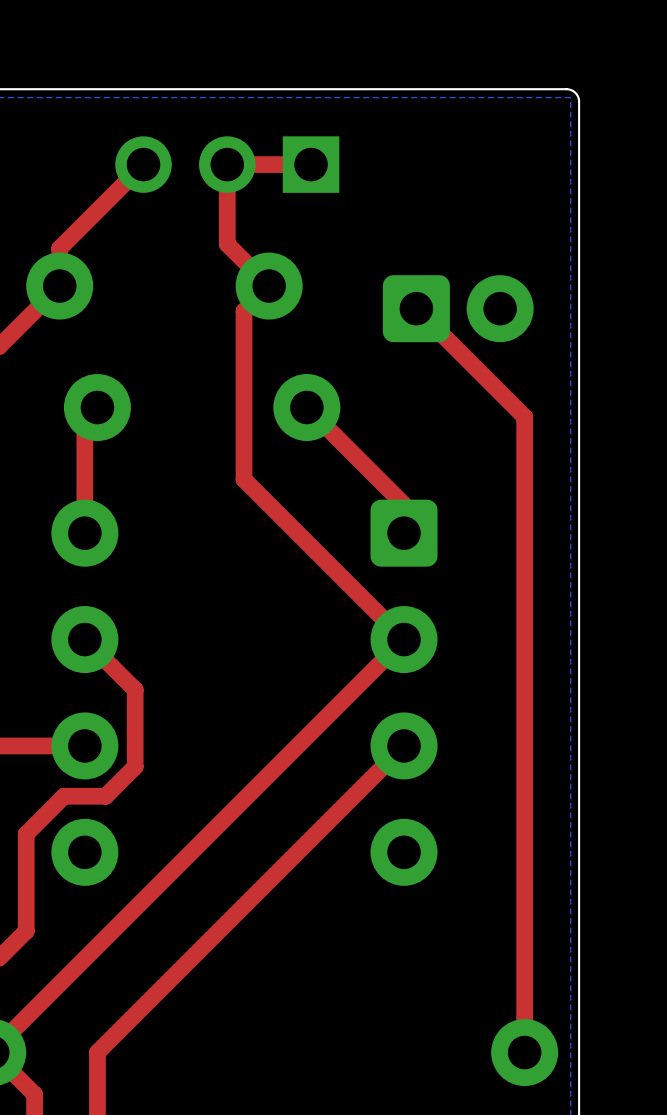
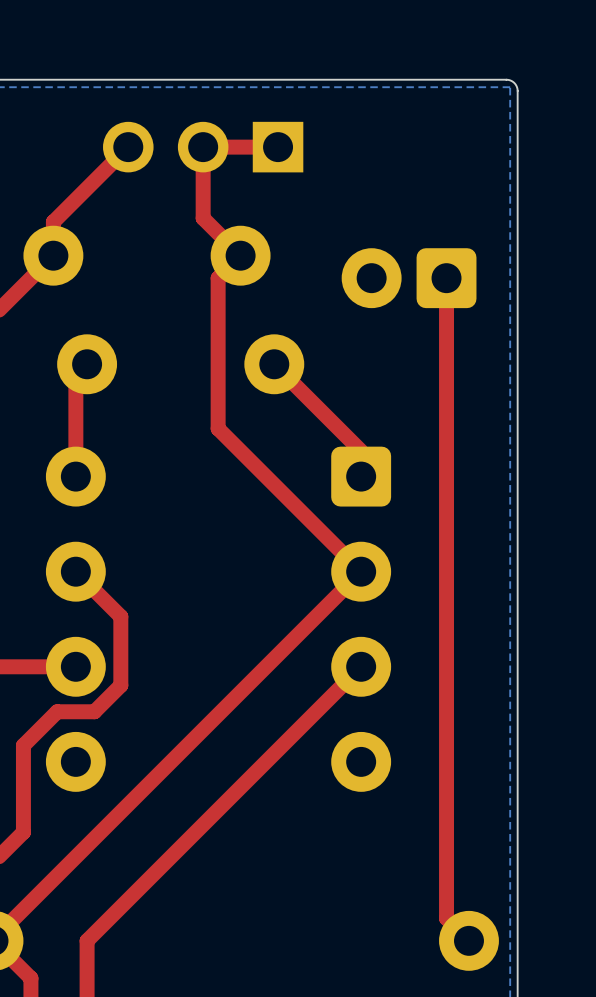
top track: (416, 308) (524, 416) (524, 1052) -> (446, 278) (446, 918) (468, 940)
part rotation: 0° (458, 308) -> 180° (409, 278)

